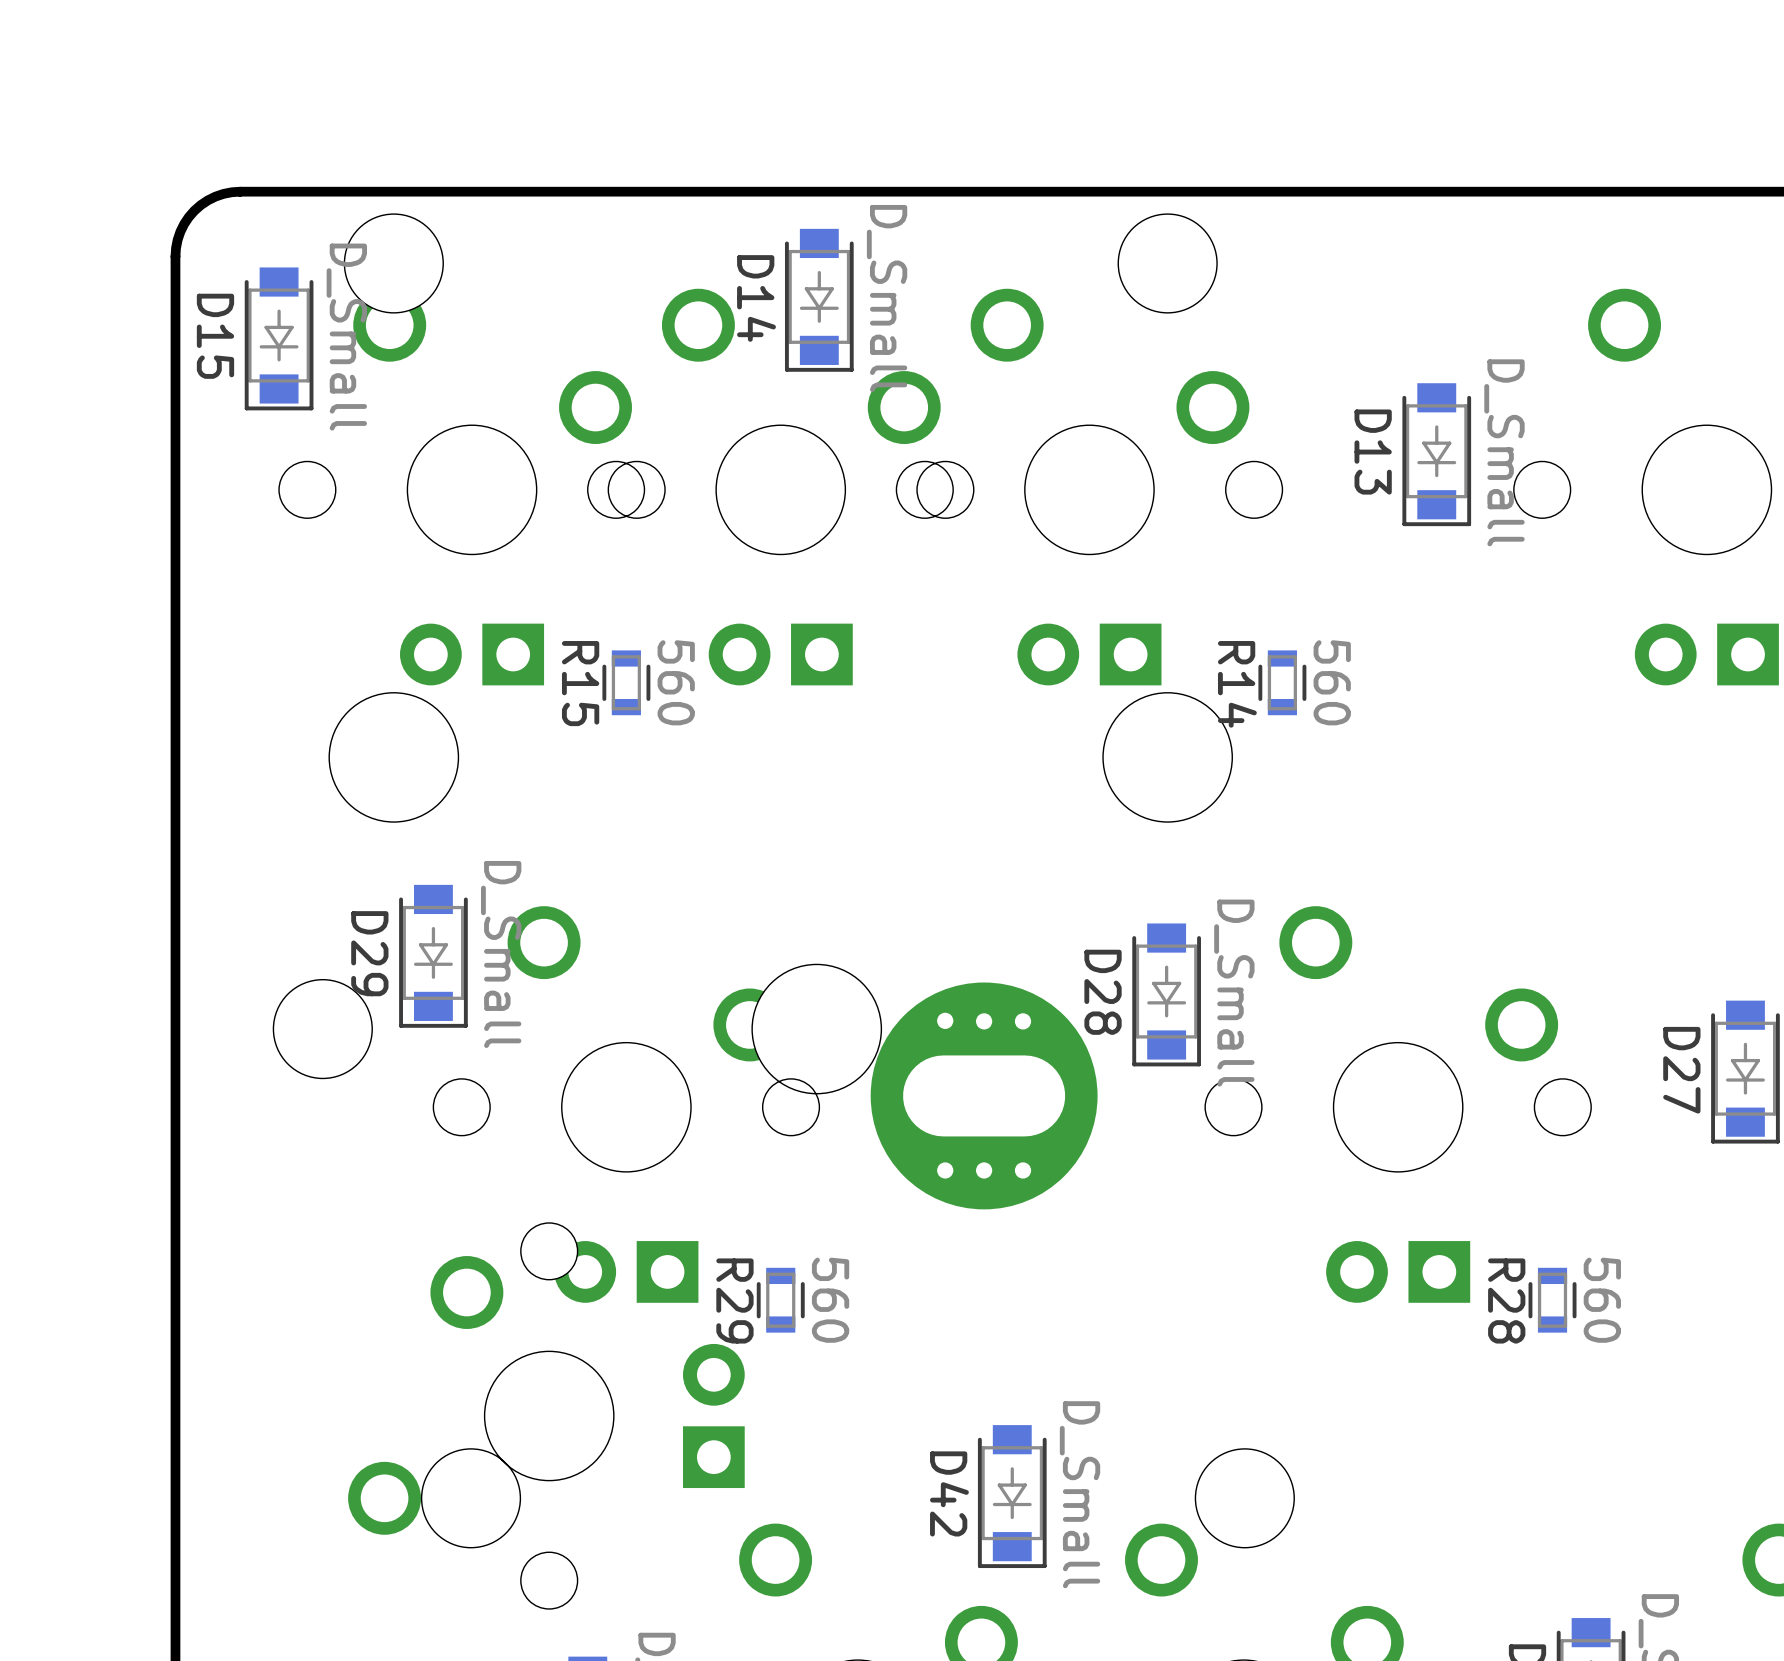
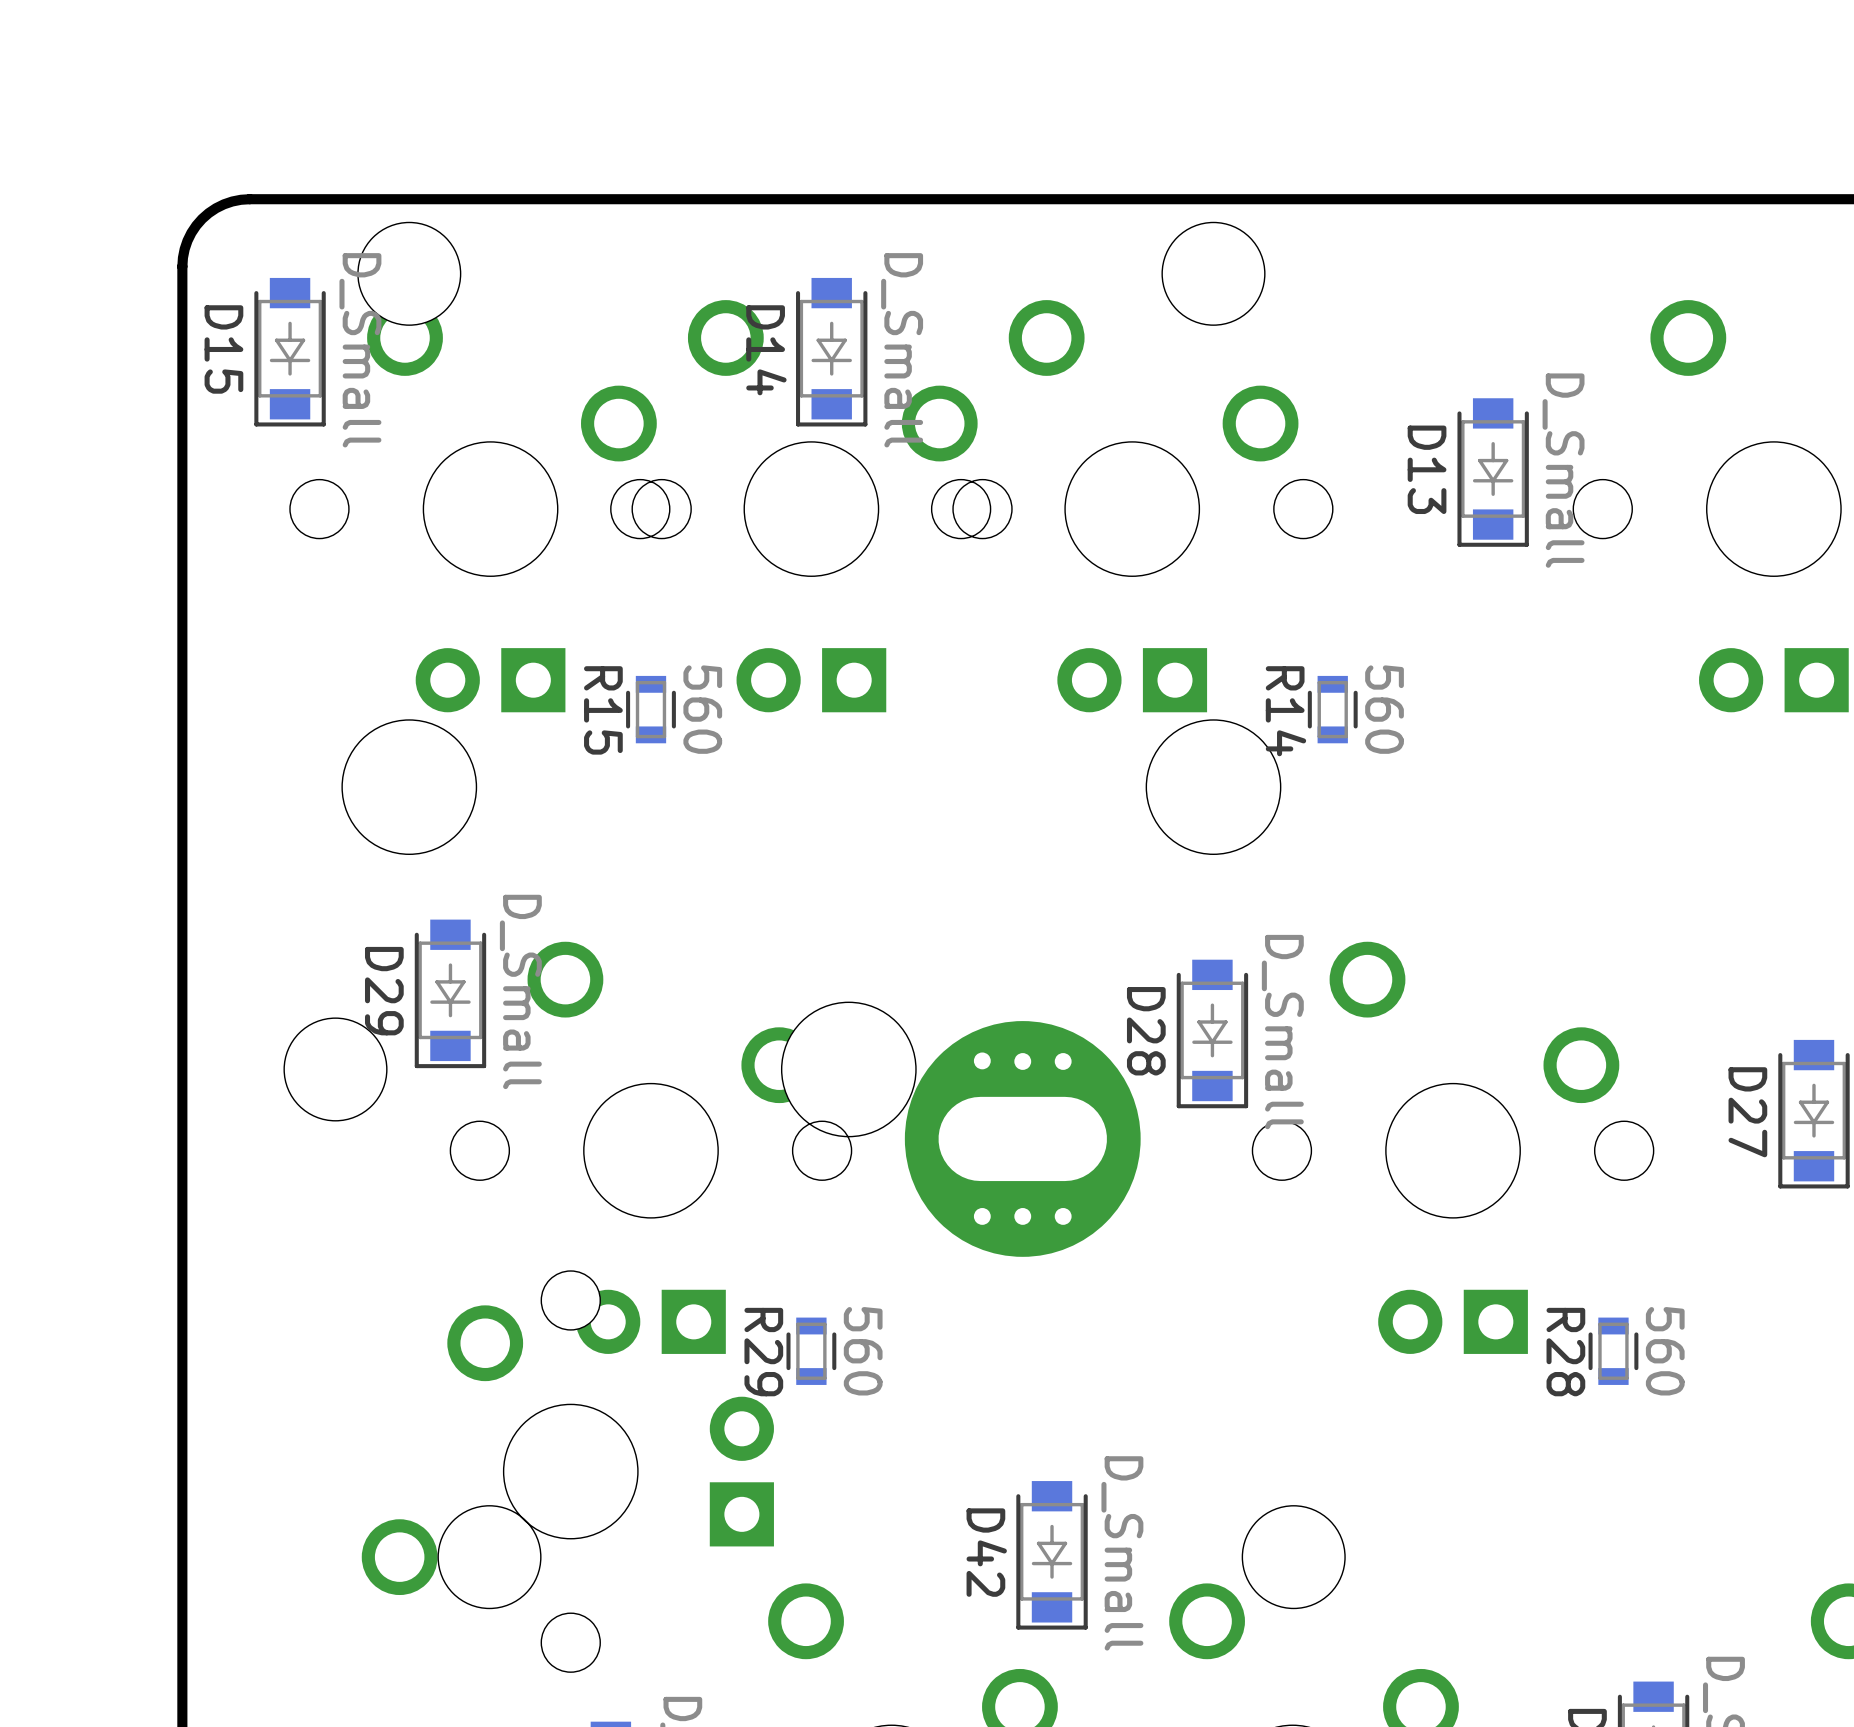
D14 position: (819, 300) -> (831, 352)

